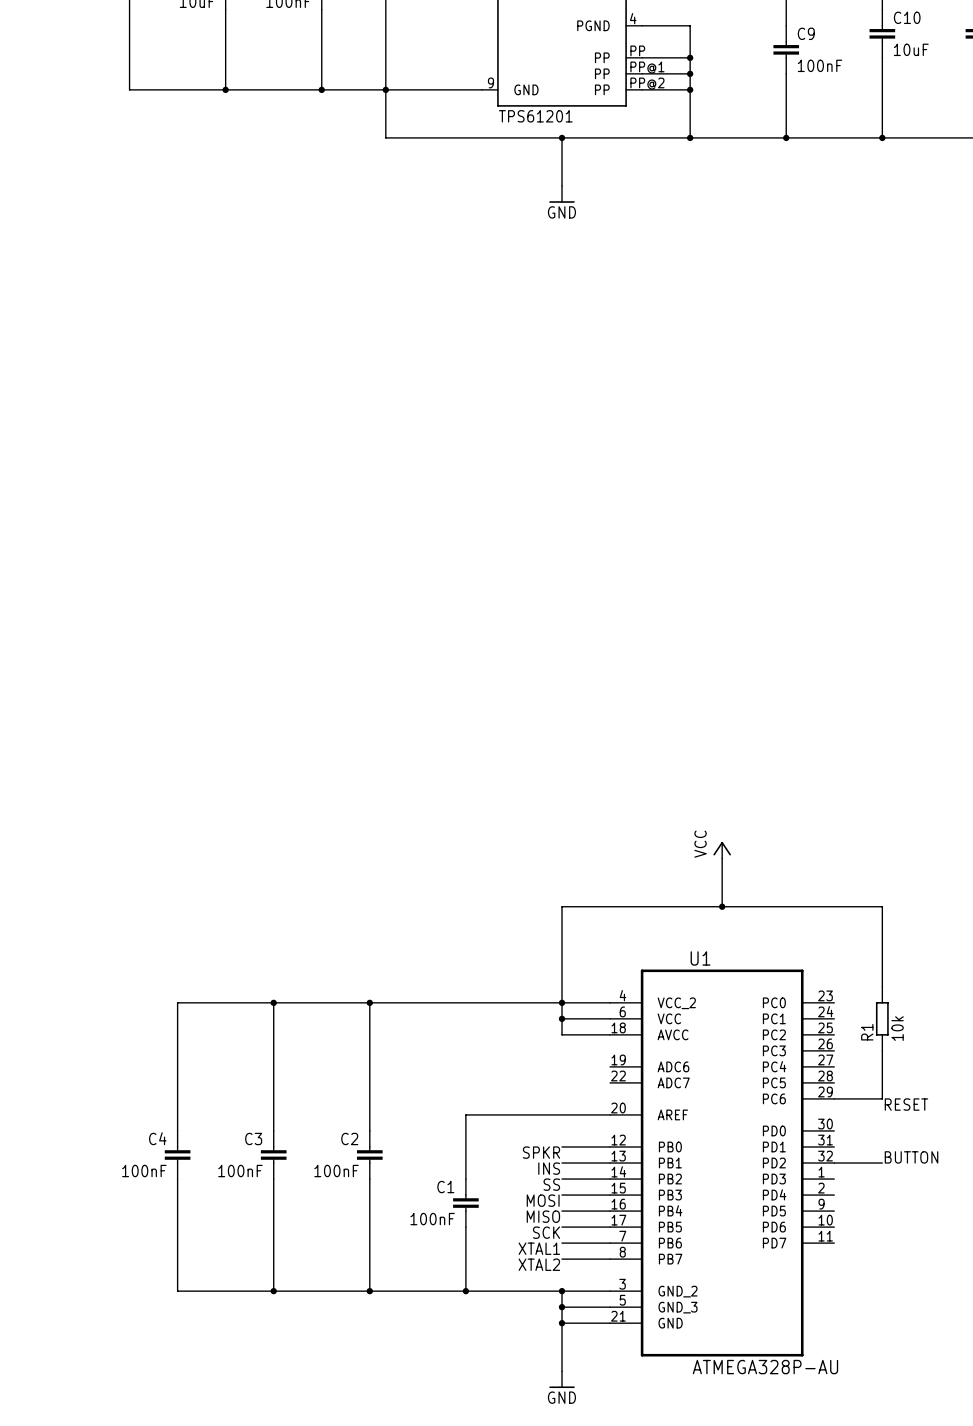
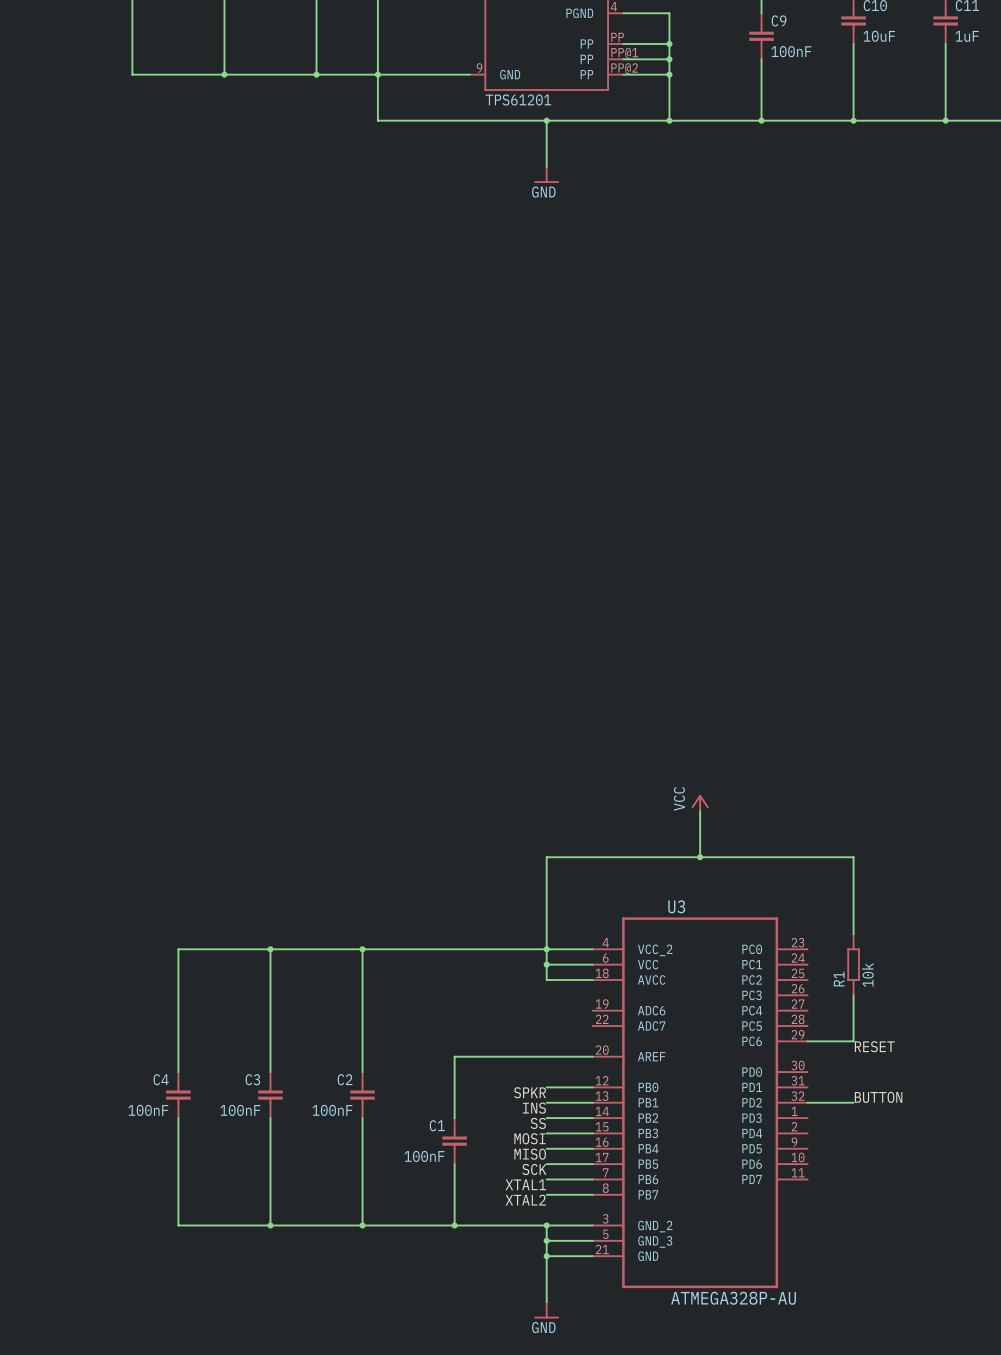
U1 name: U1 (700, 958) -> U3 (676, 906)

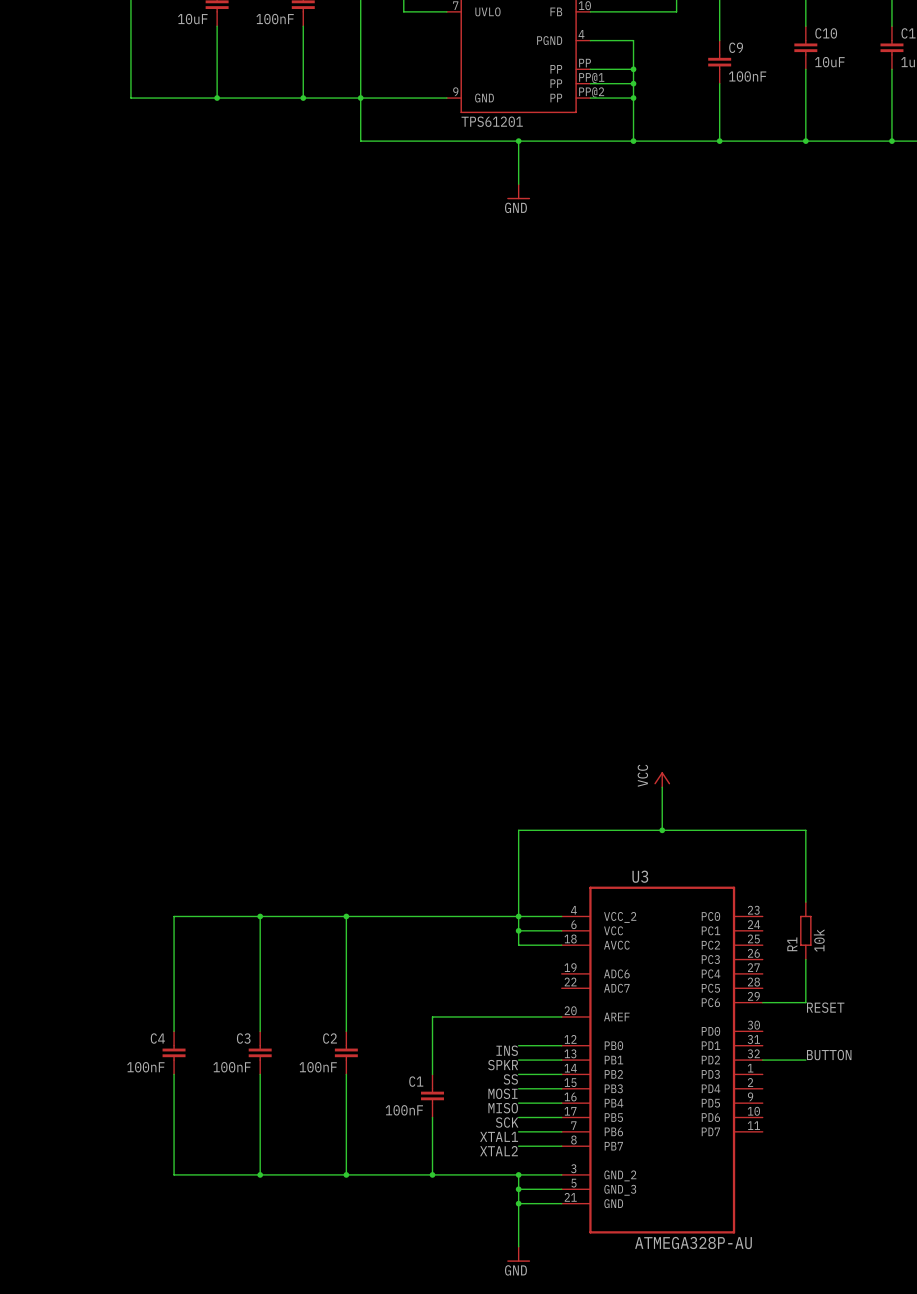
label: SPKR (530, 1092) -> INS (507, 1050)
label: INS (534, 1108) -> SPKR (503, 1065)

